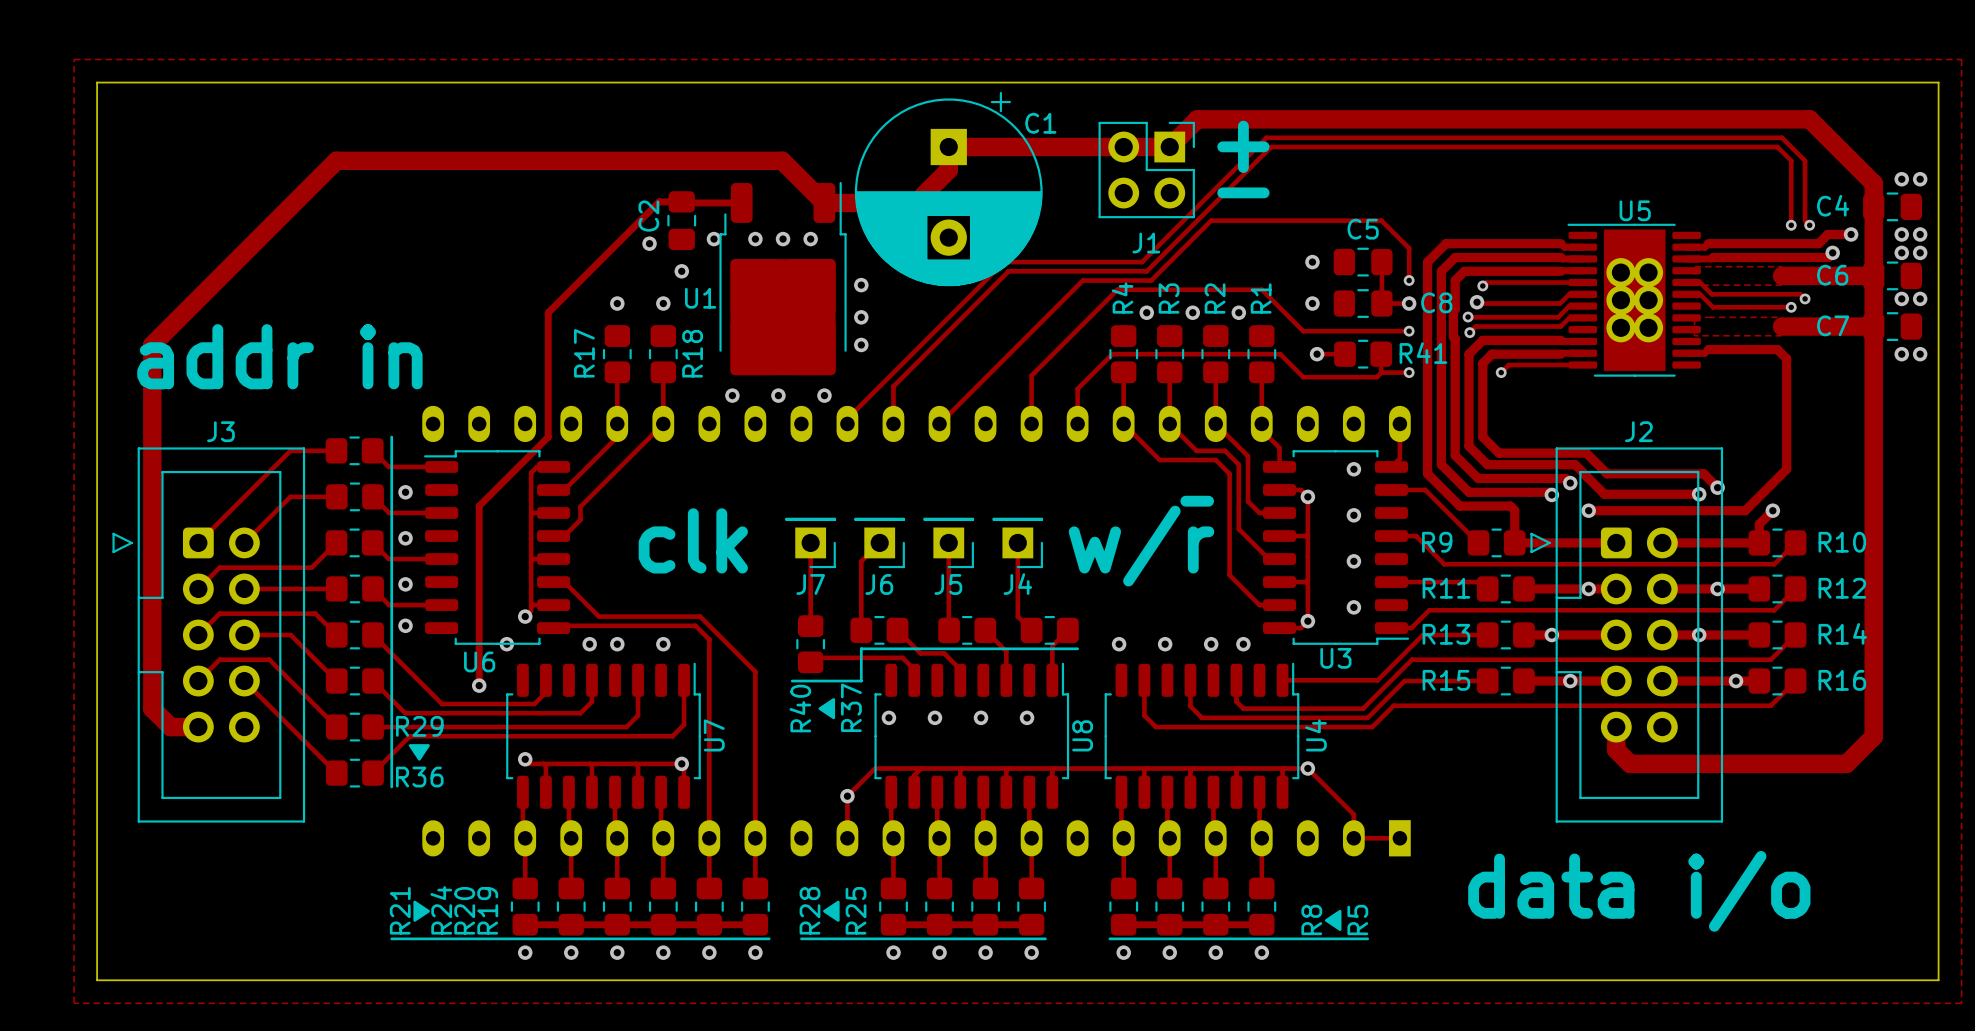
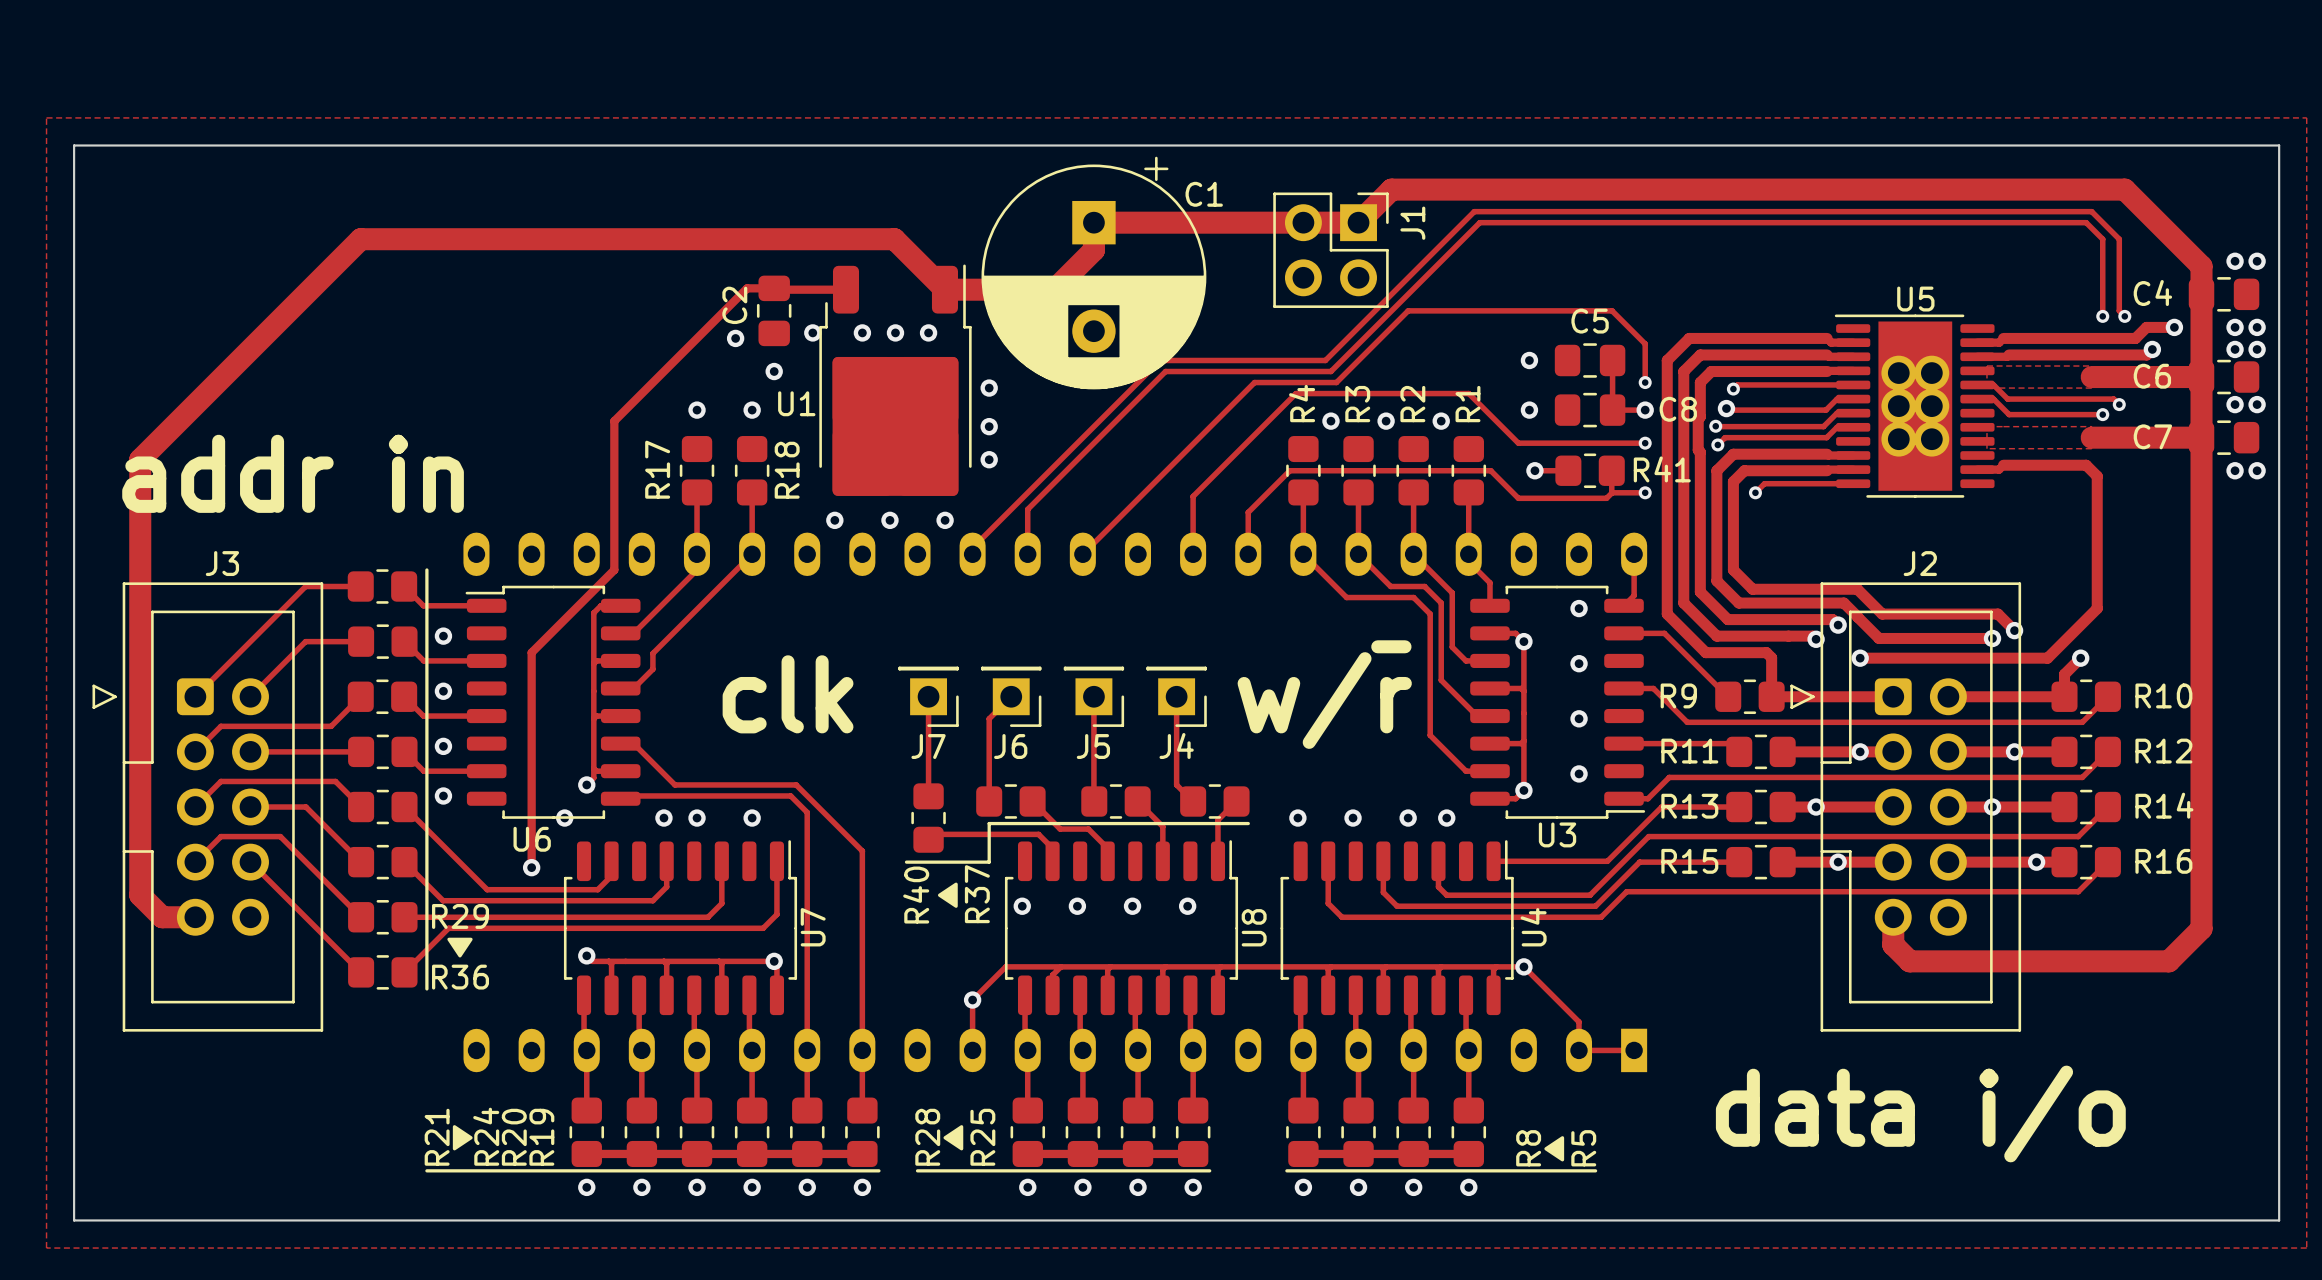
text: + (1243, 146) -> none
text: - (1243, 192) -> none
J1 name rotation: 0° (1146, 243) -> 90° counterclockwise (1412, 223)
J1 name position: J1 (1146, 243) -> J1 (1412, 223)

